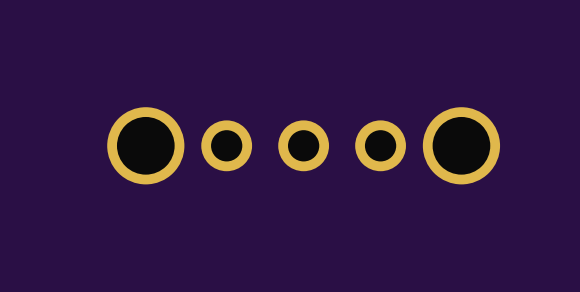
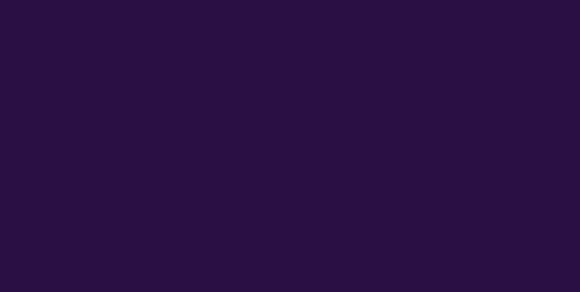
part: (303, 145) -> none

